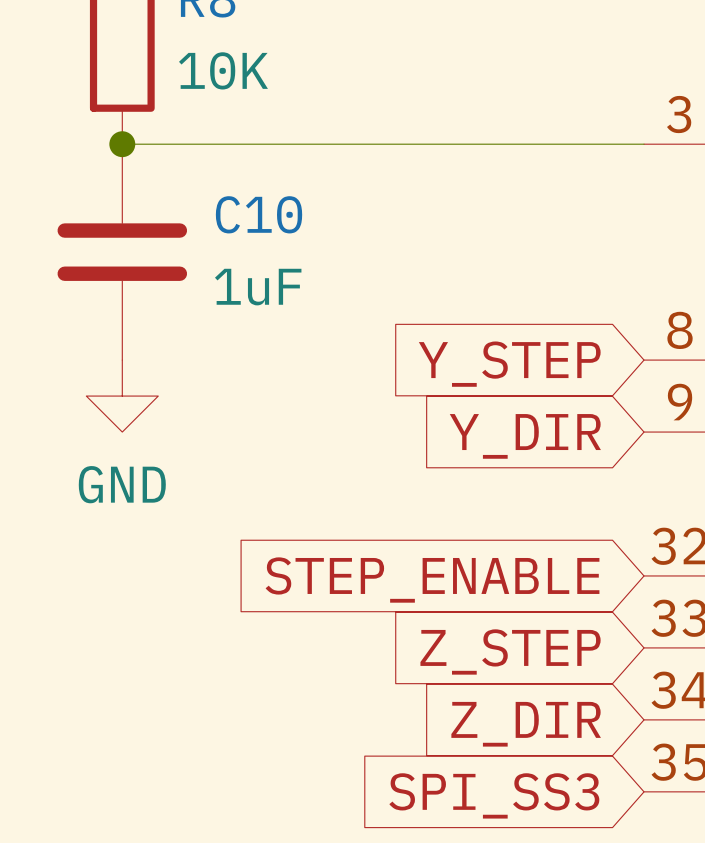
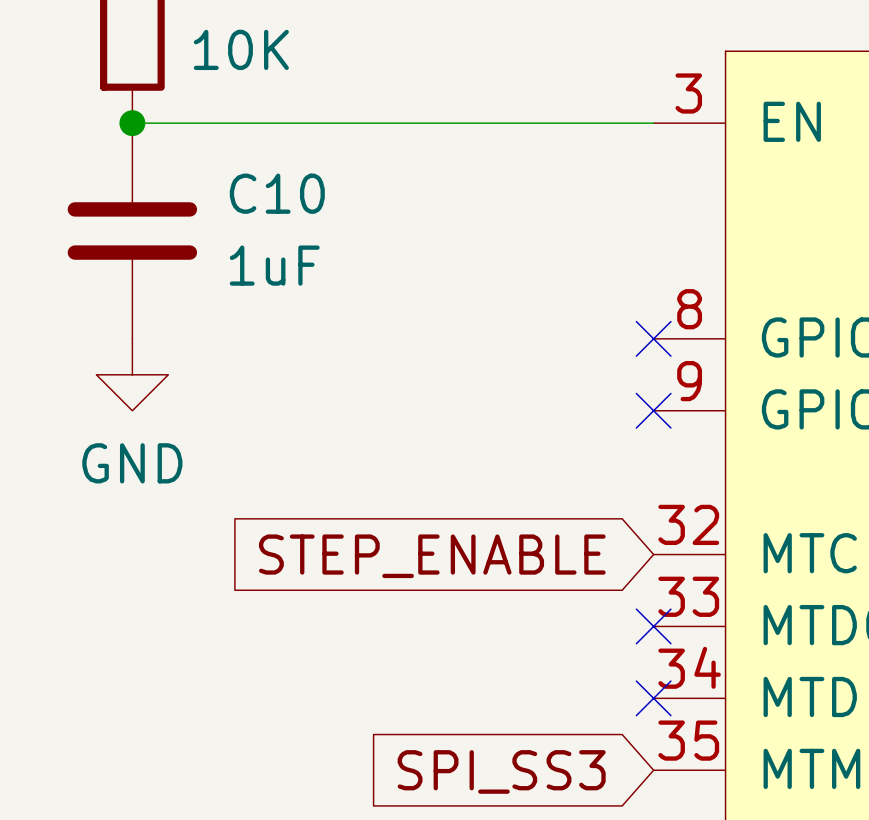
no-connect mark: none -> (653, 338)
global label: Y_STEP (509, 364) -> none
no-connect mark: none -> (653, 410)
global label: Y_DIR (525, 436) -> none
no-connect mark: none -> (653, 626)
global label: Z_STEP (510, 651) -> none
no-connect mark: none -> (653, 698)
global label: Z_DIR (526, 724) -> none

